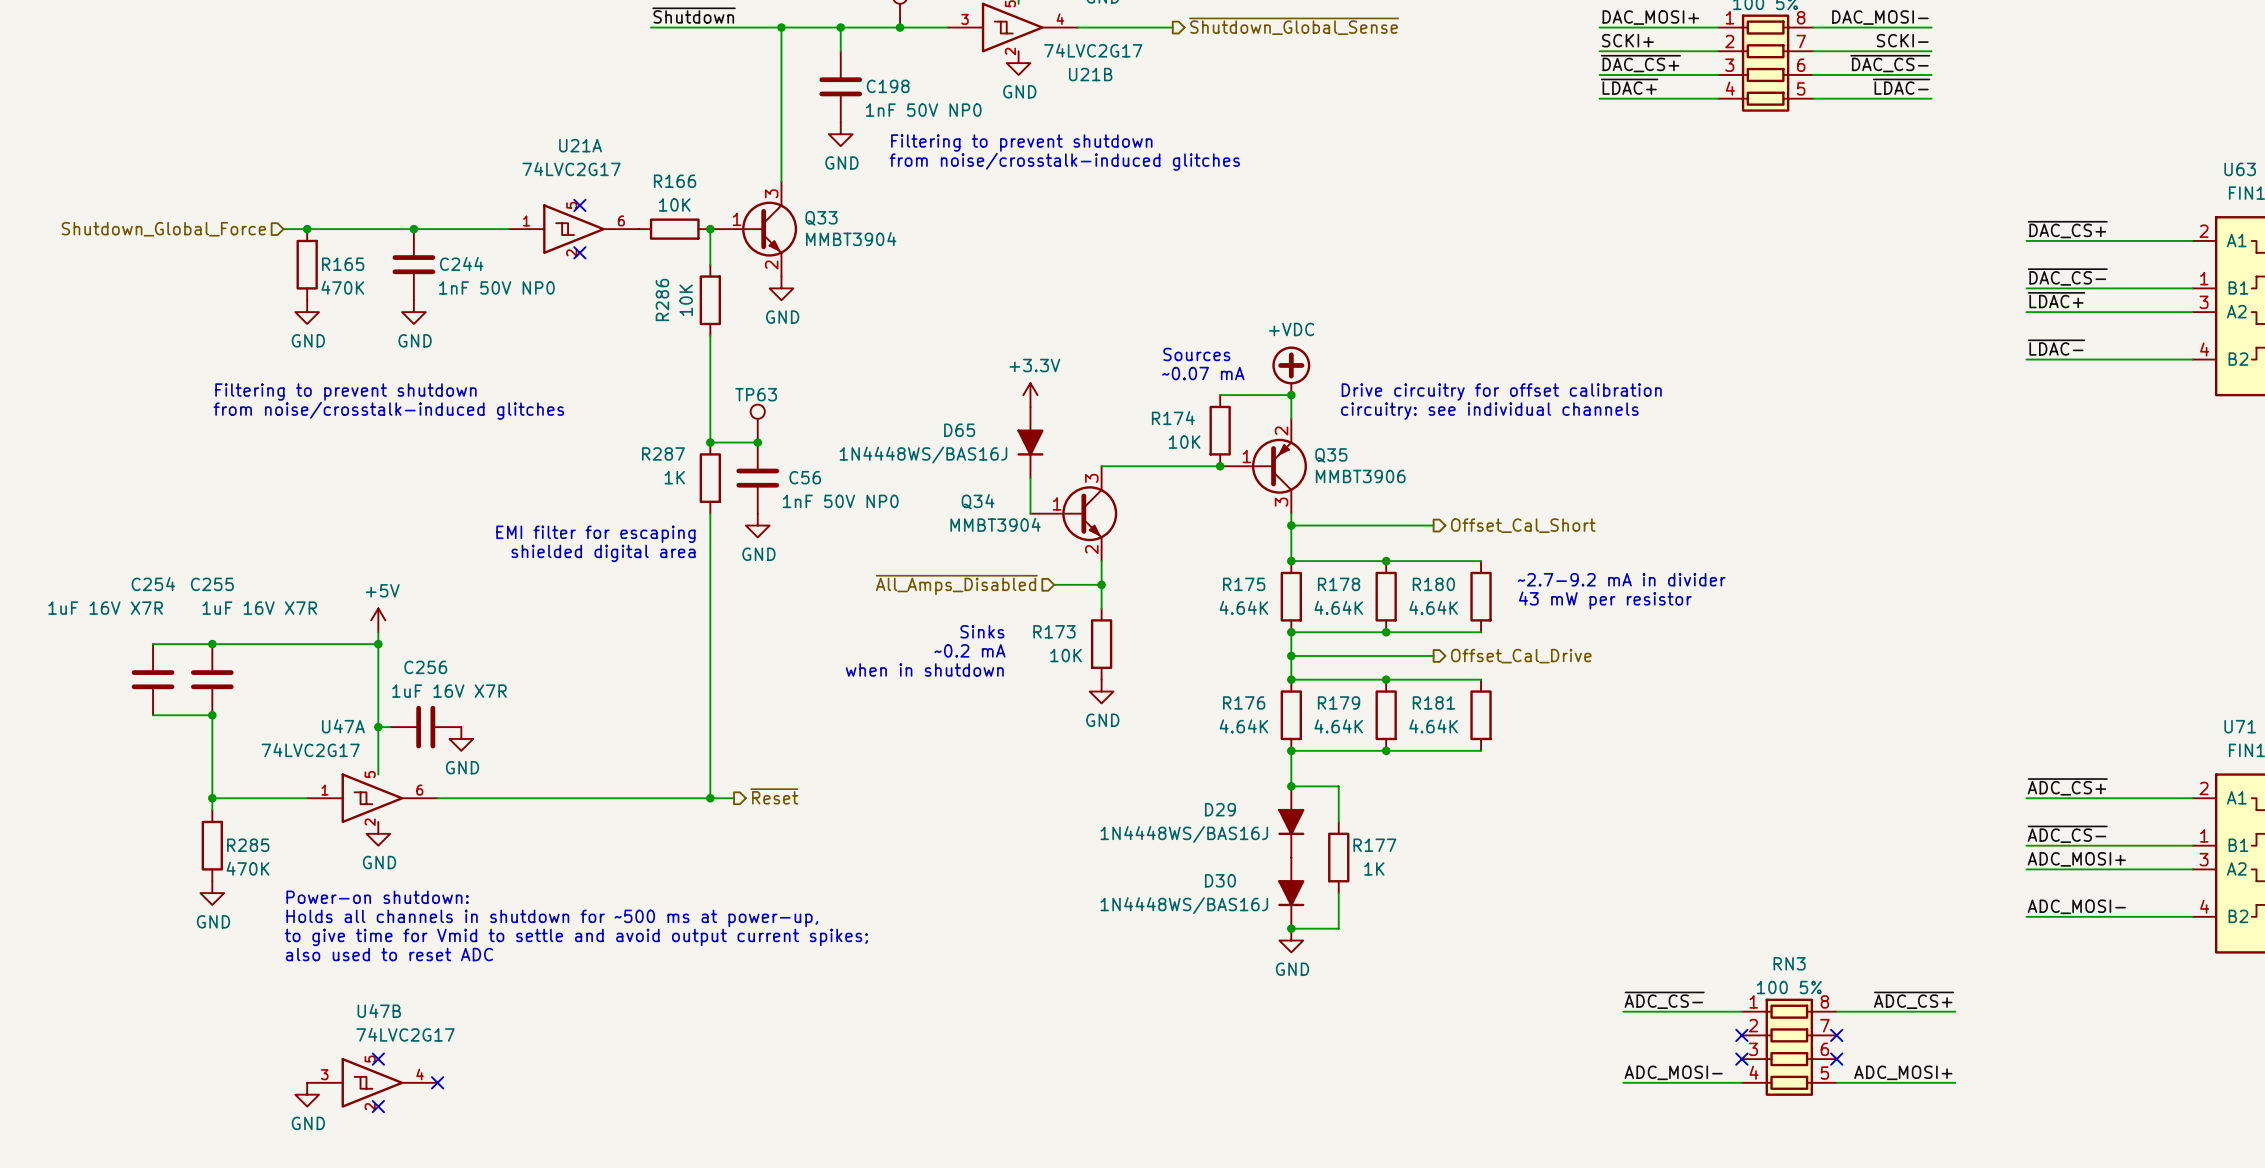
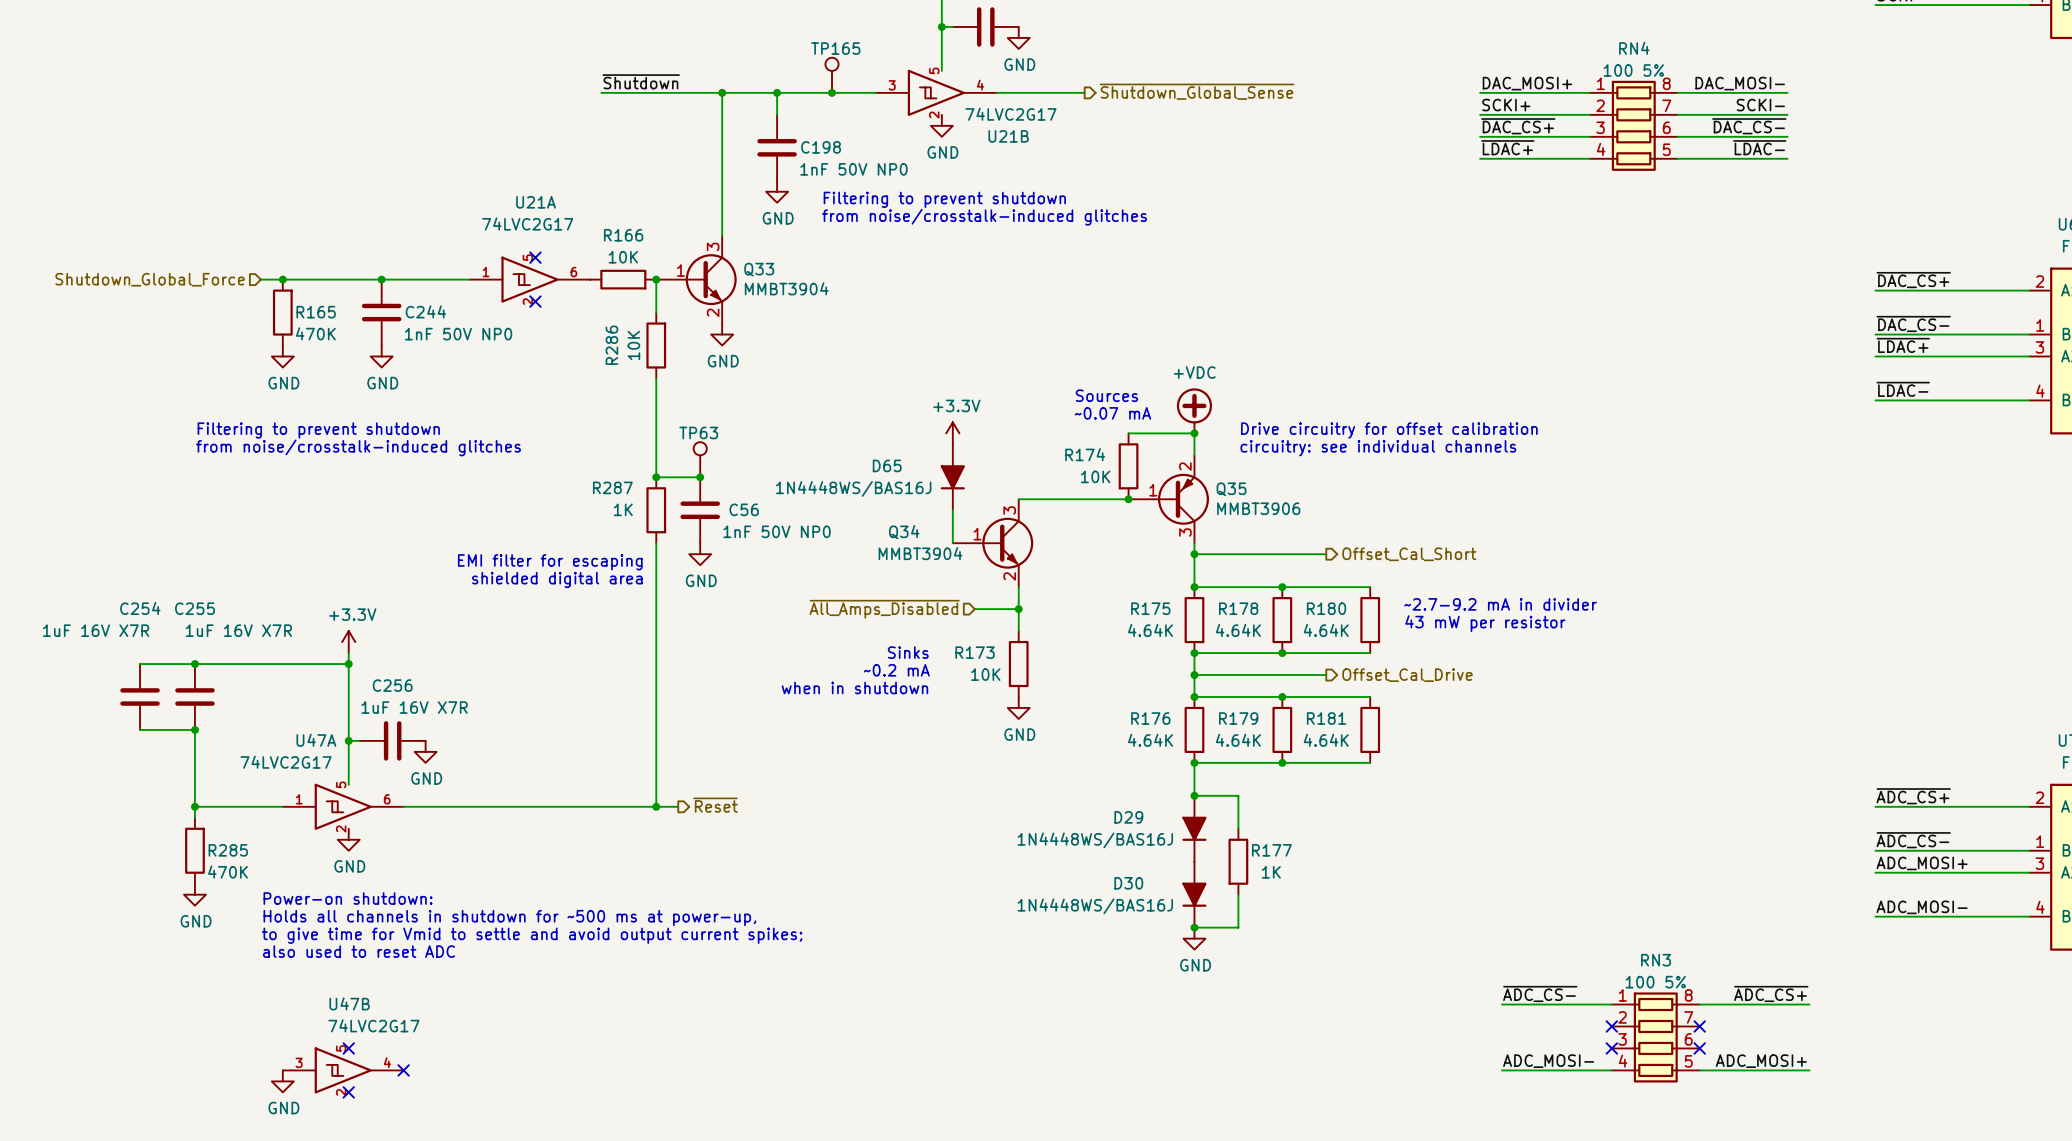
power symbol: +5V (378, 620) -> +3.3V (348, 642)

